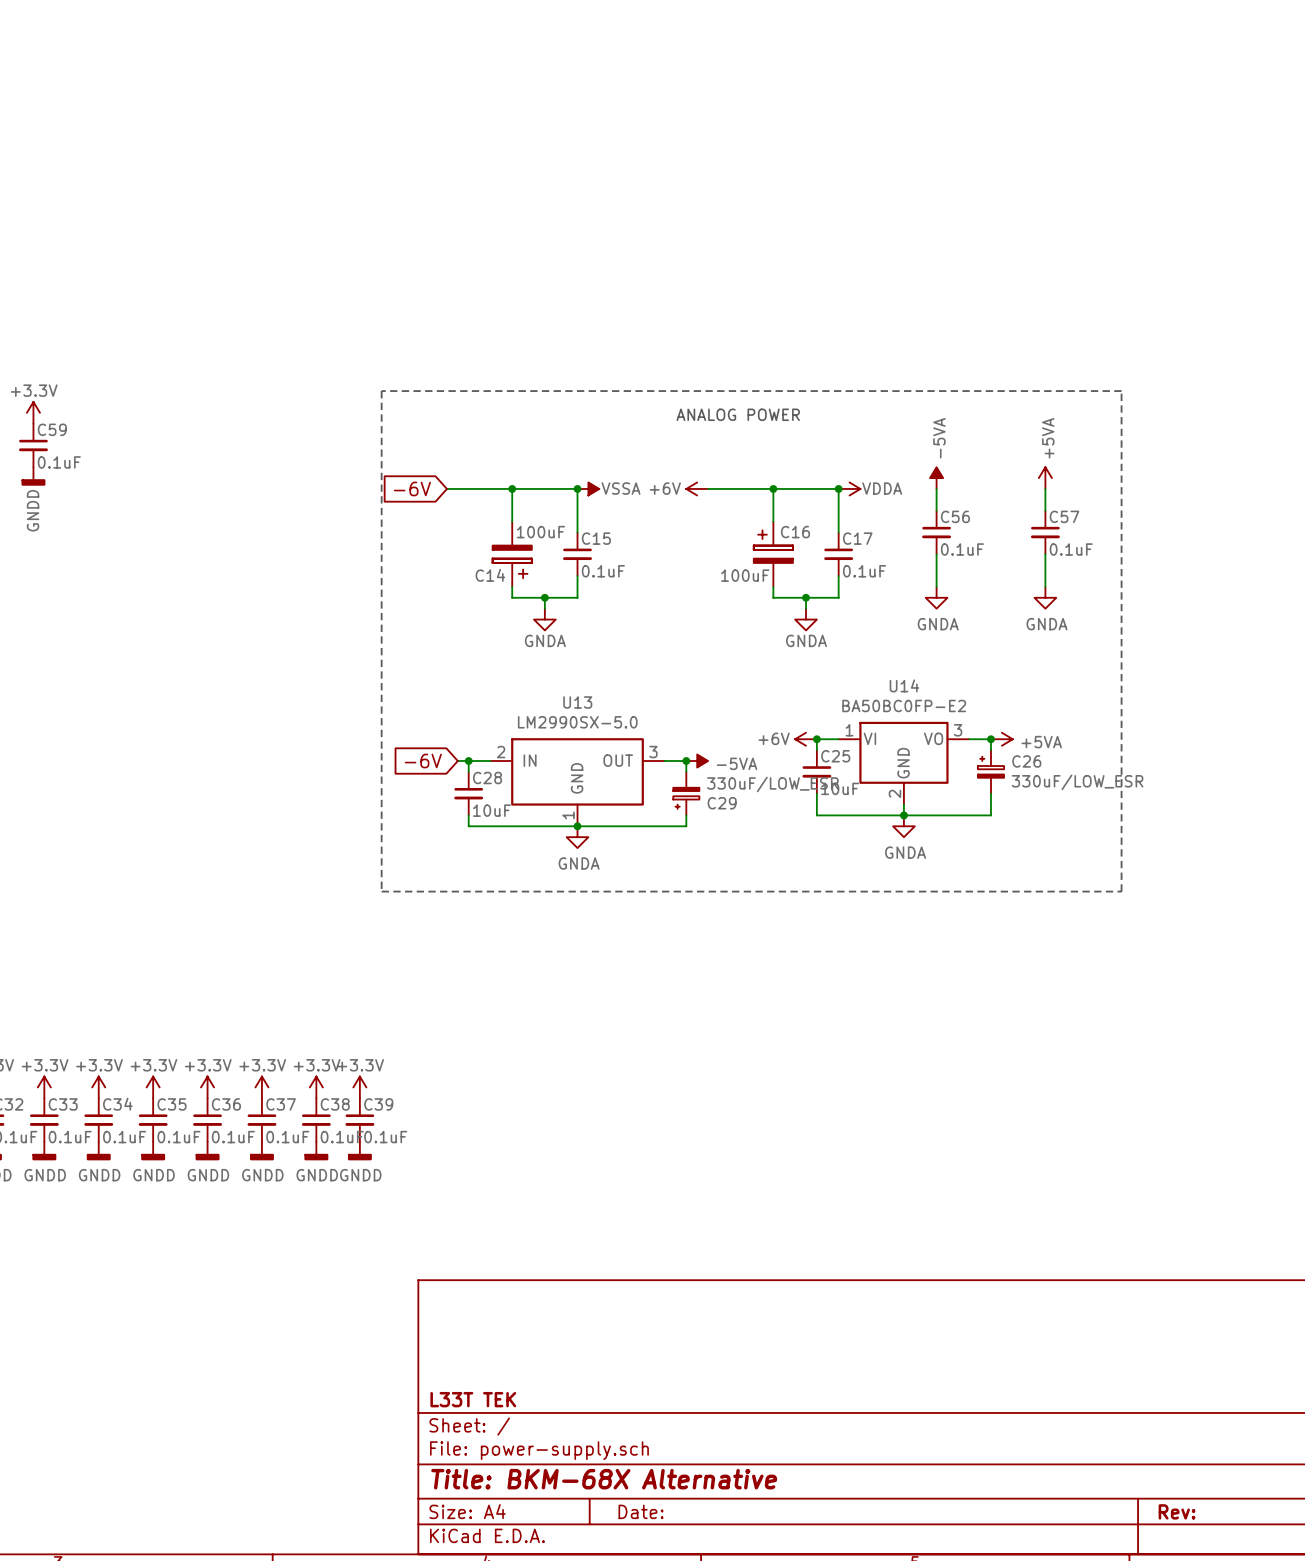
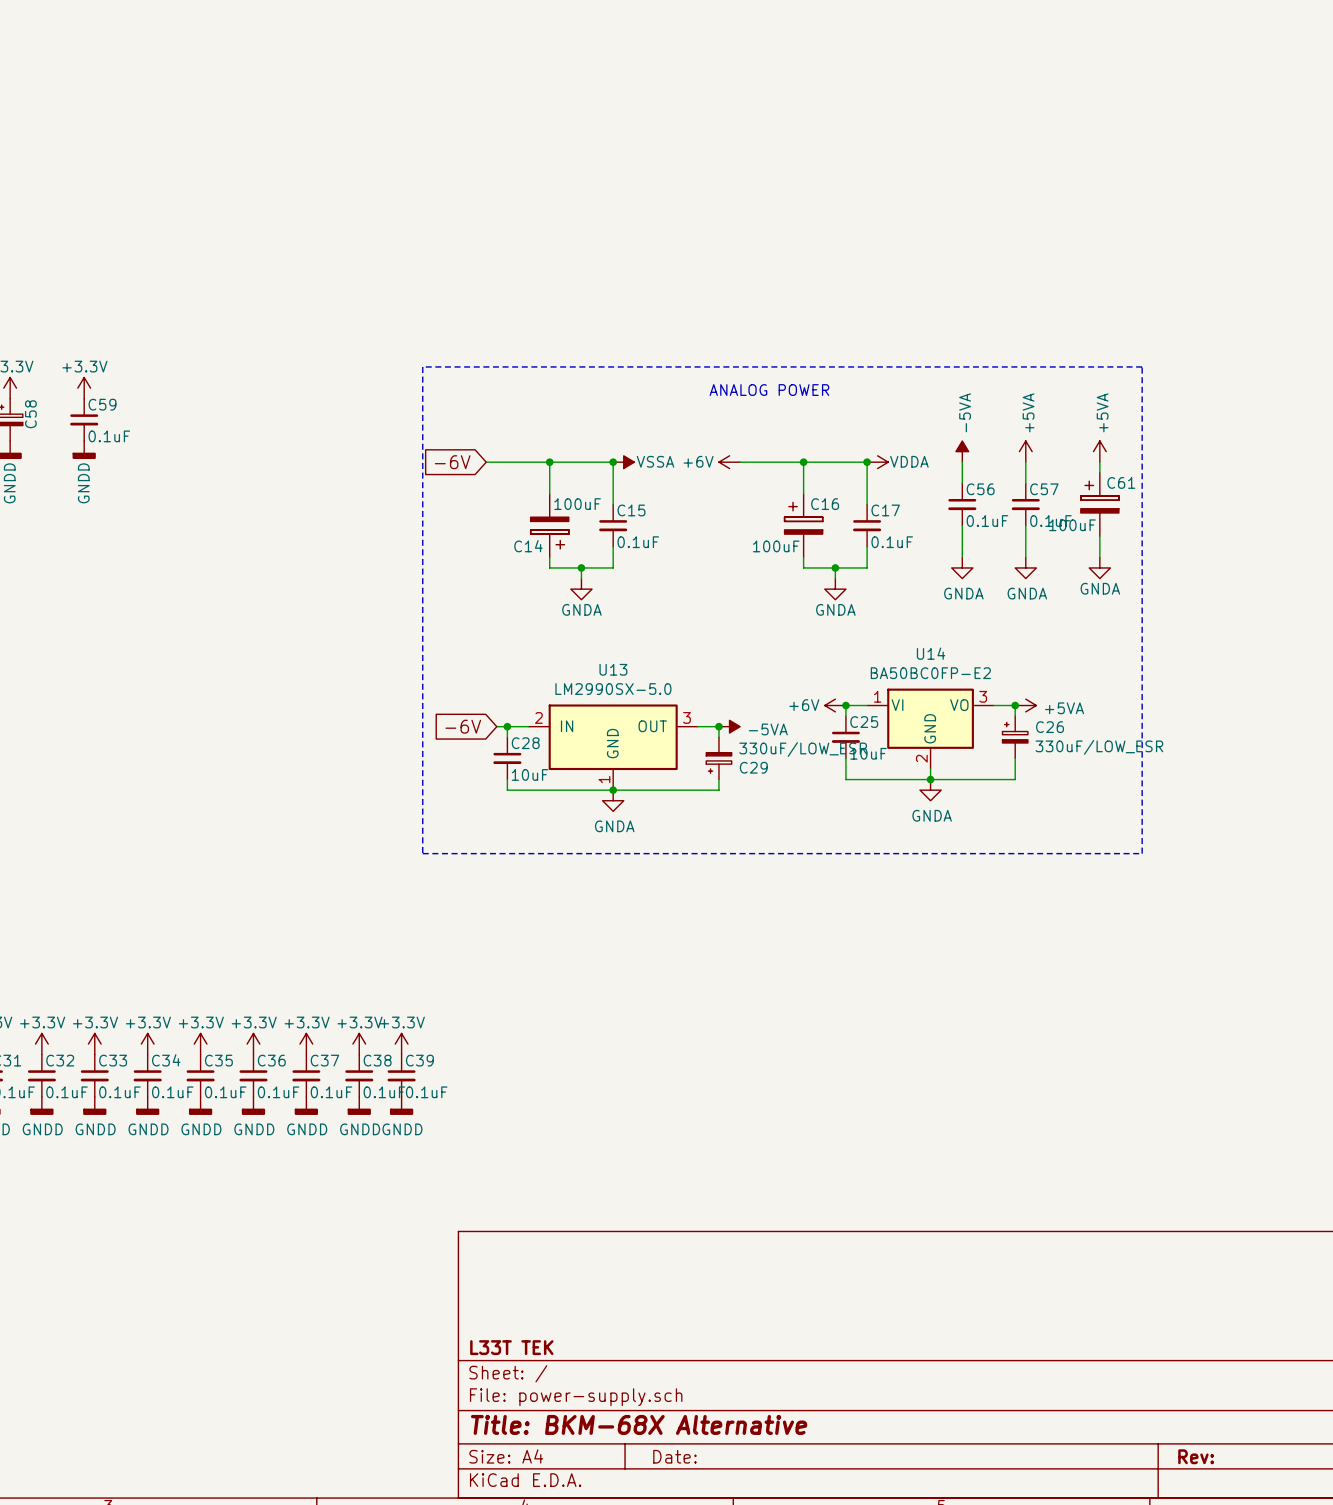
power symbol: none -> +5VA (1025, 451)
power symbol: +5VA (1045, 478) -> none
power symbol: none -> +5VA (1099, 451)
wire: (1045, 488) (1045, 510) -> (1025, 462) (1025, 483)
wire: none -> (1099, 462) (1099, 472)
C57 position: (1045, 532) -> (1025, 504)
C61: none -> 100uF (1099, 504)
wire: (1045, 554) (1045, 586) -> (1025, 525) (1025, 557)
wire: none -> (1099, 536) (1099, 557)
power symbol: none -> GNDA (1025, 567)
power symbol: GNDA (1045, 597) -> none
power symbol: none -> GNDA (1099, 567)

